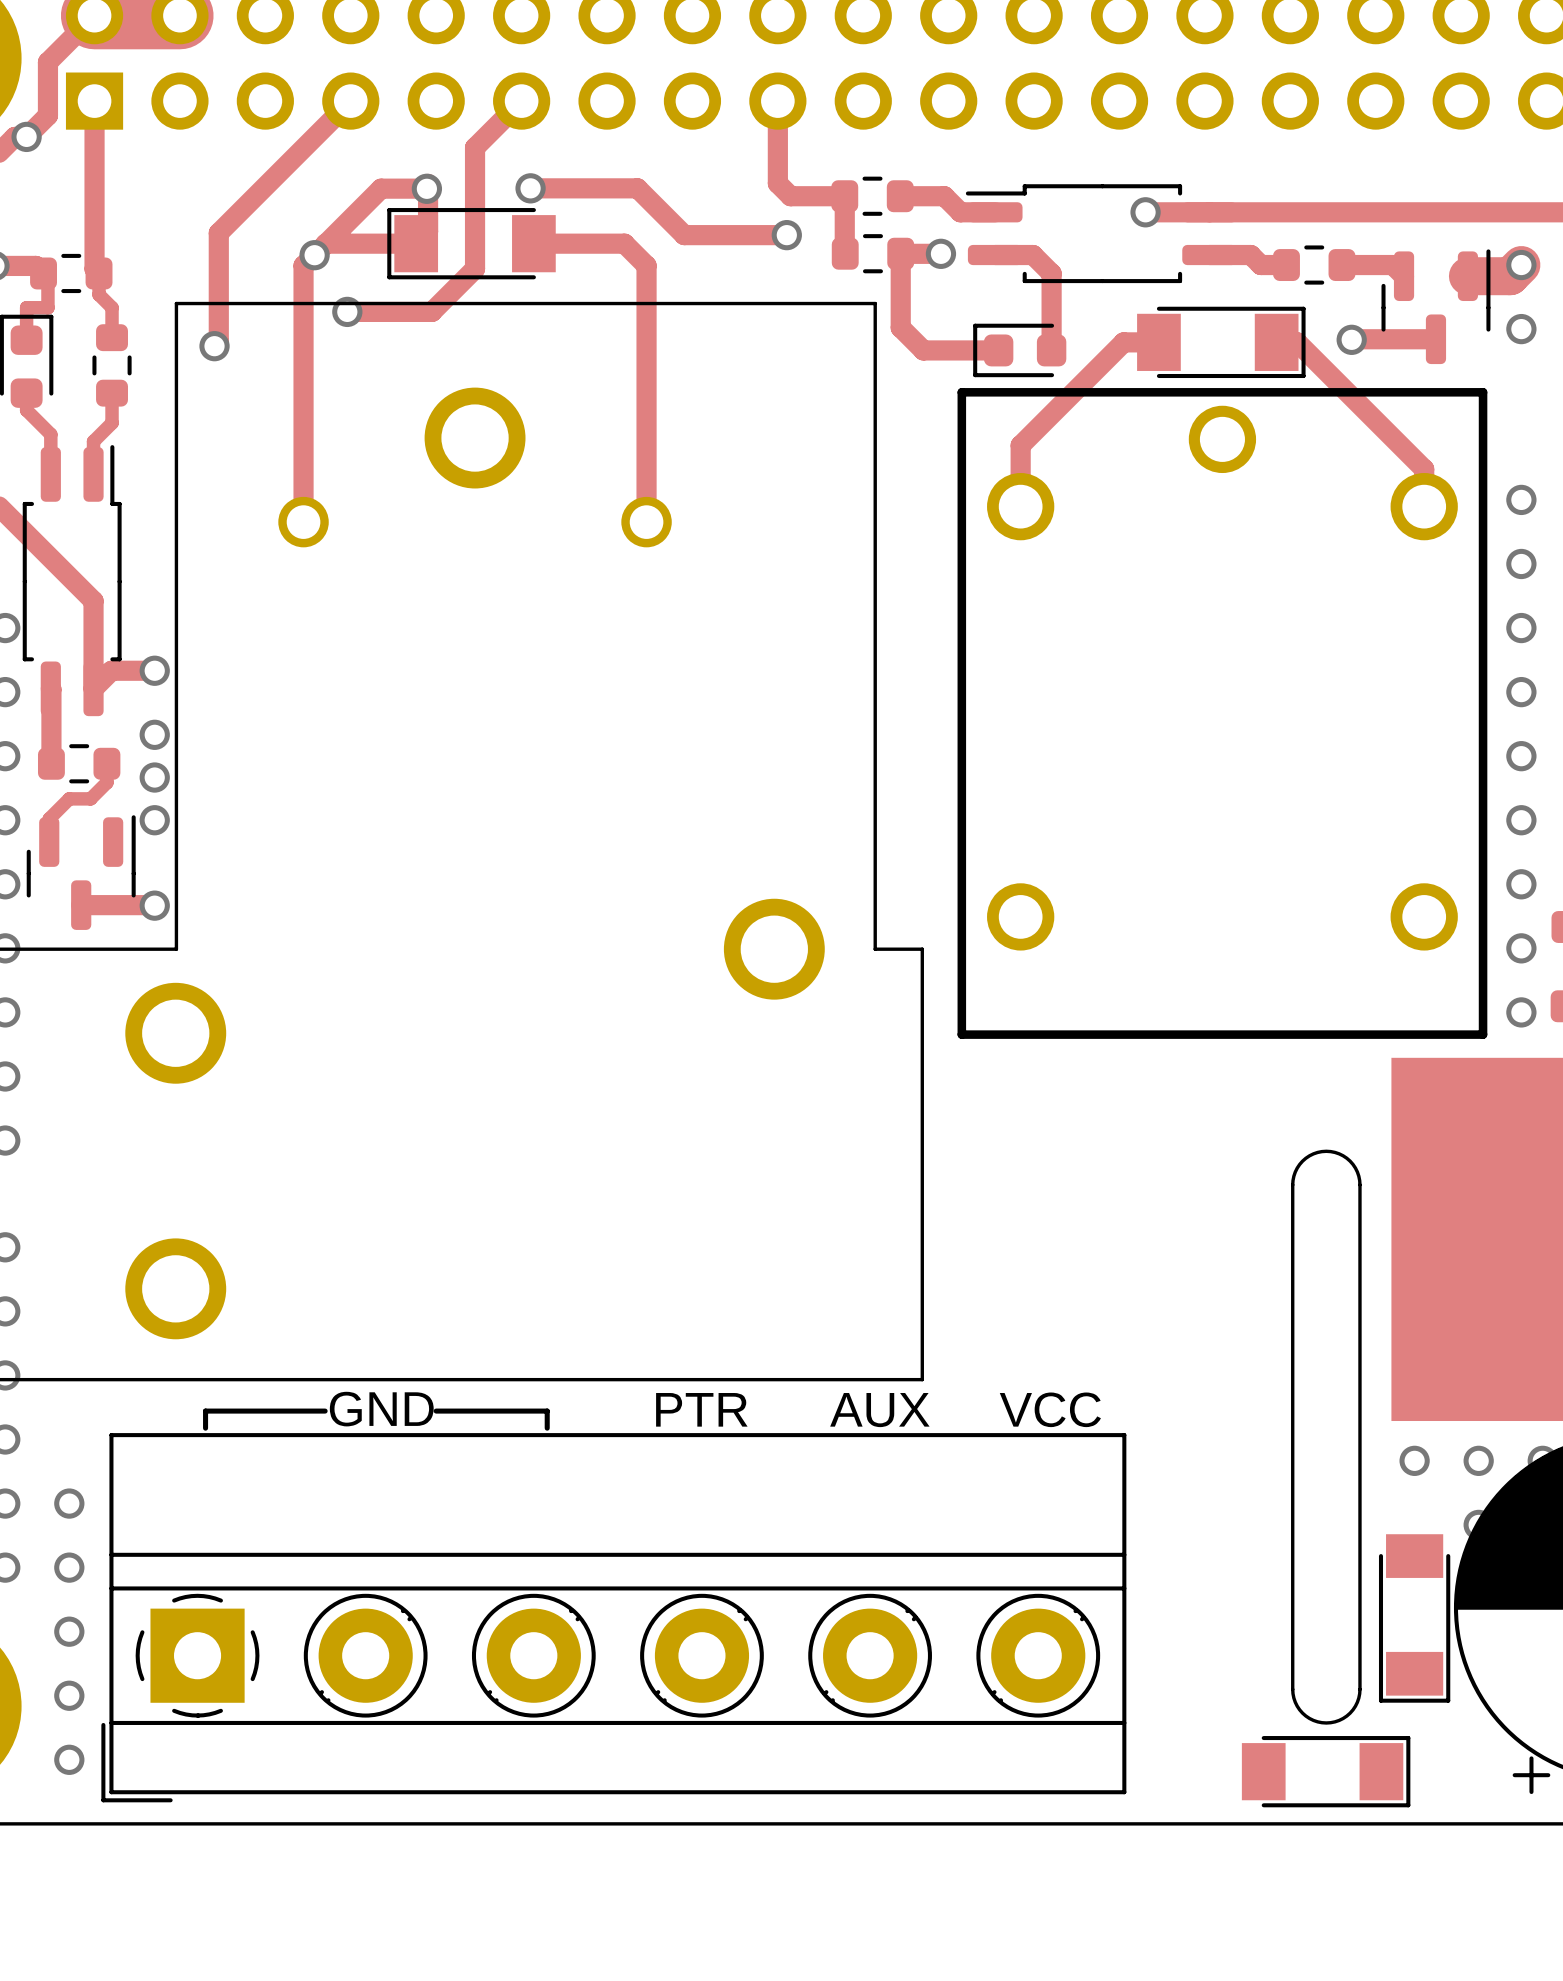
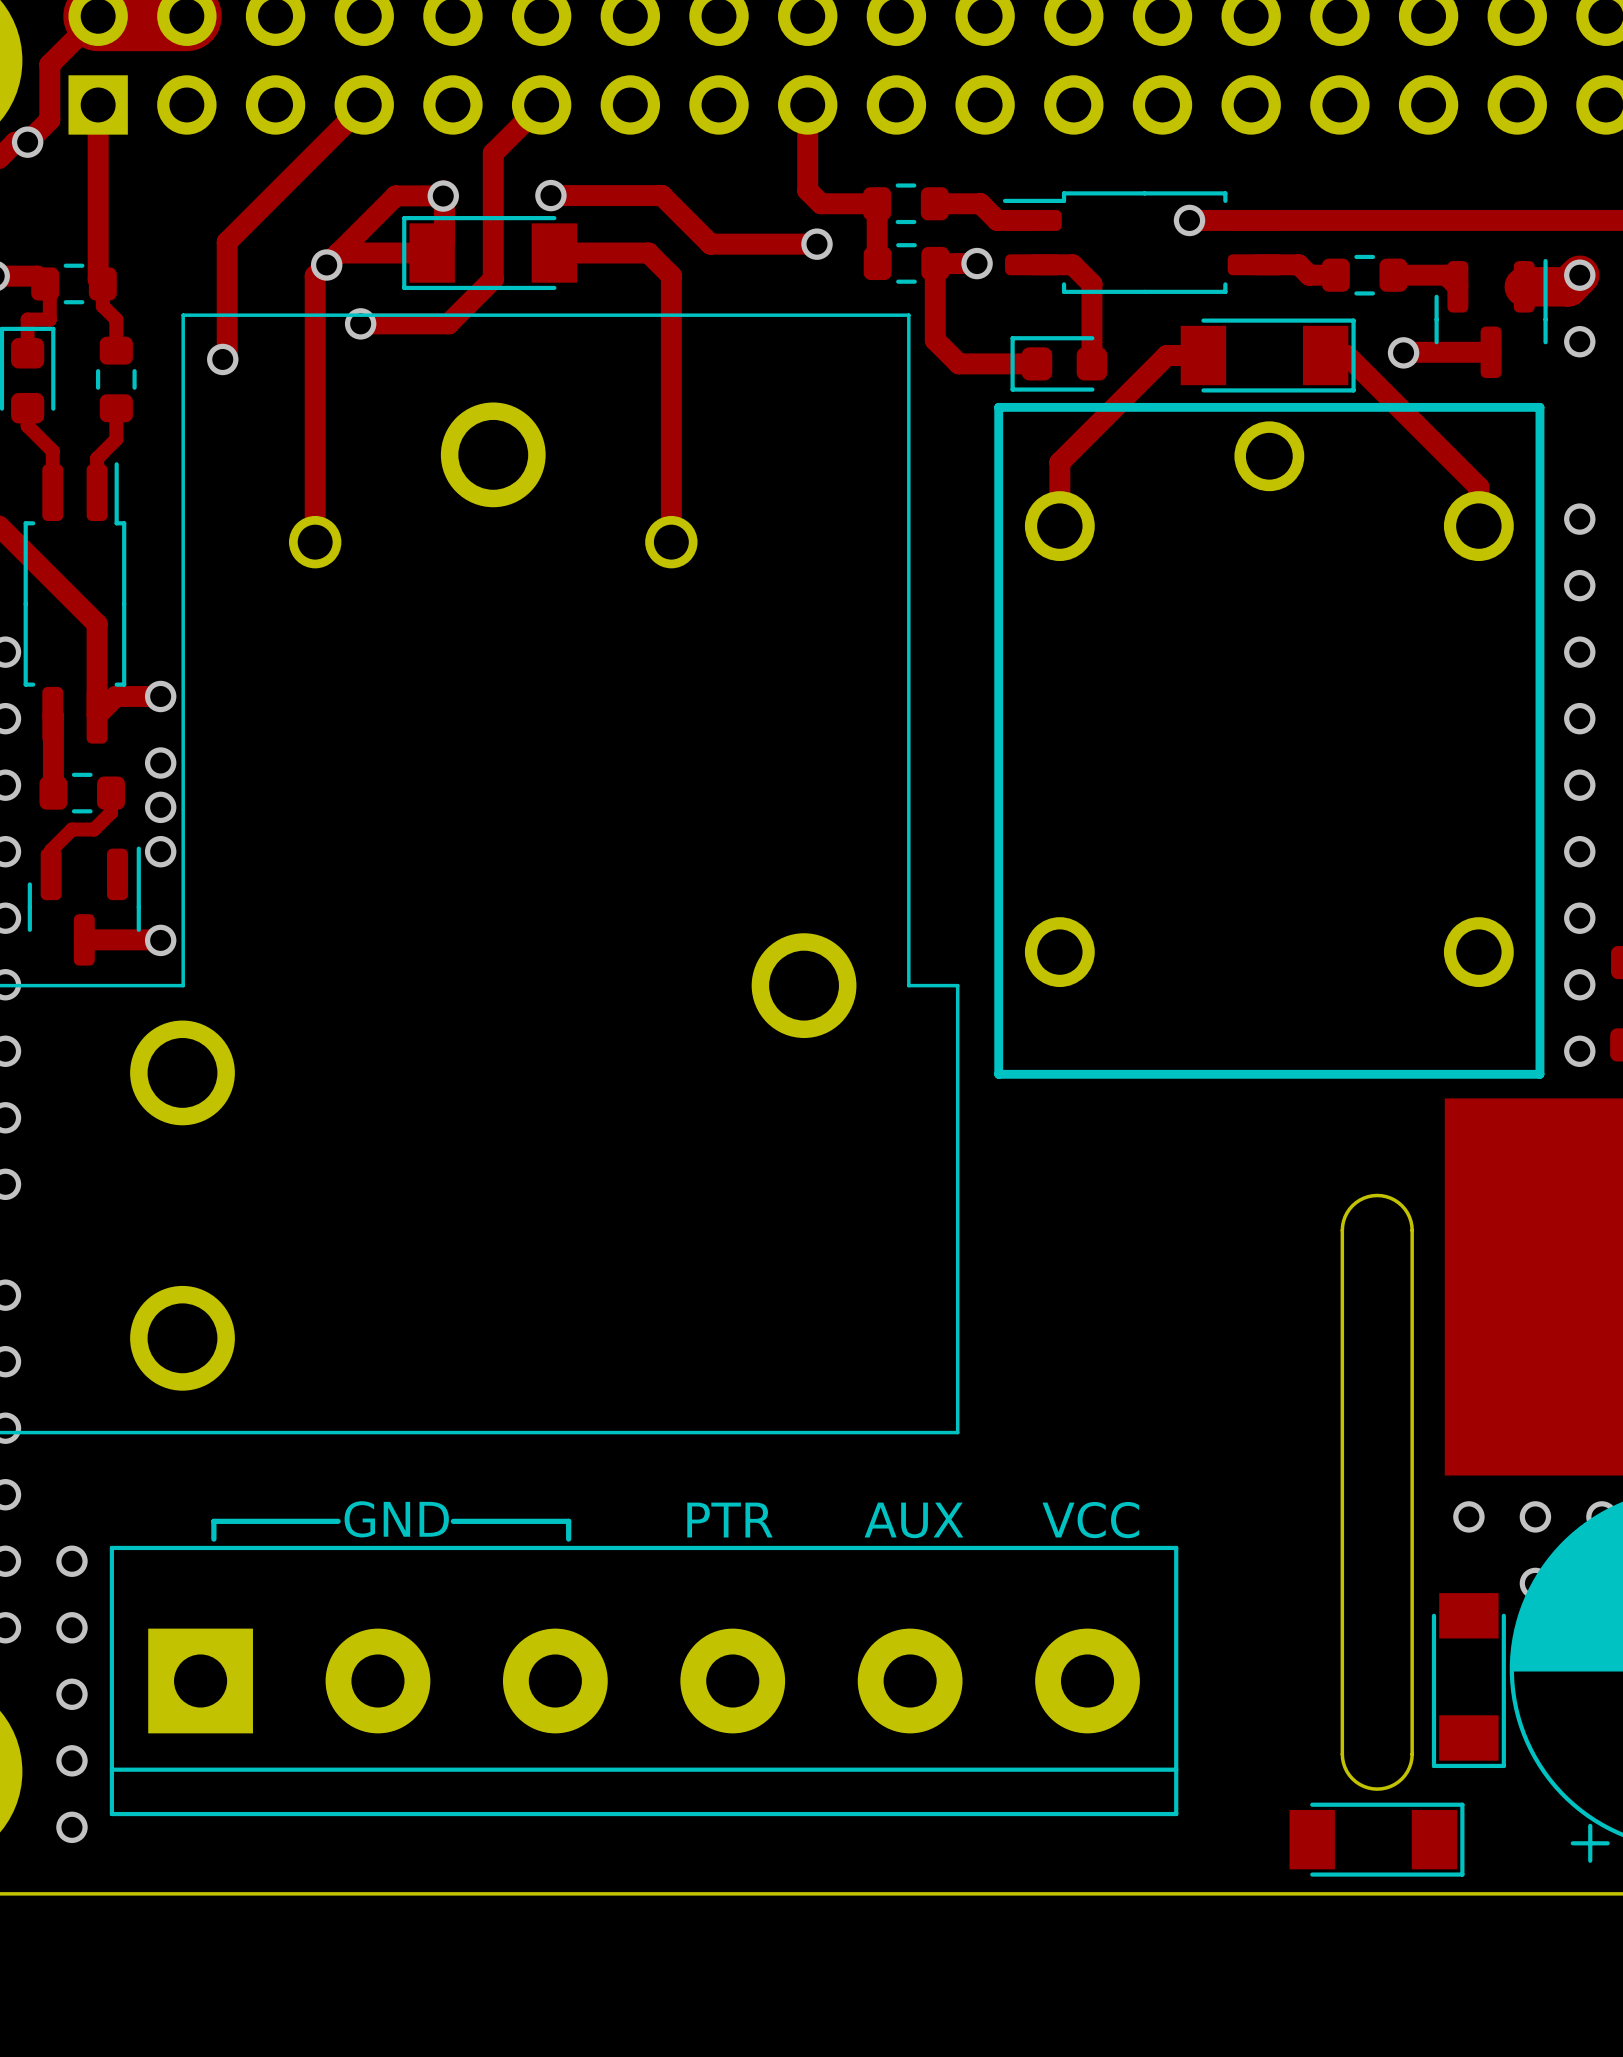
text position: GND (381, 1409) -> GND (396, 1519)
text position: PTR (701, 1409) -> PTR (729, 1520)
text position: VCC (1050, 1409) -> VCC (1090, 1520)
text position: AUX (879, 1410) -> AUX (914, 1520)
line: (325, 1411) (205, 1411) (205, 1428) -> (338, 1521) (213, 1521) (213, 1539)
line: (436, 1411) (547, 1411) (547, 1428) -> (453, 1521) (568, 1521) (568, 1539)
part footprint: [101, 1433, 1127, 1803] -> [109, 1545, 1179, 1817]

